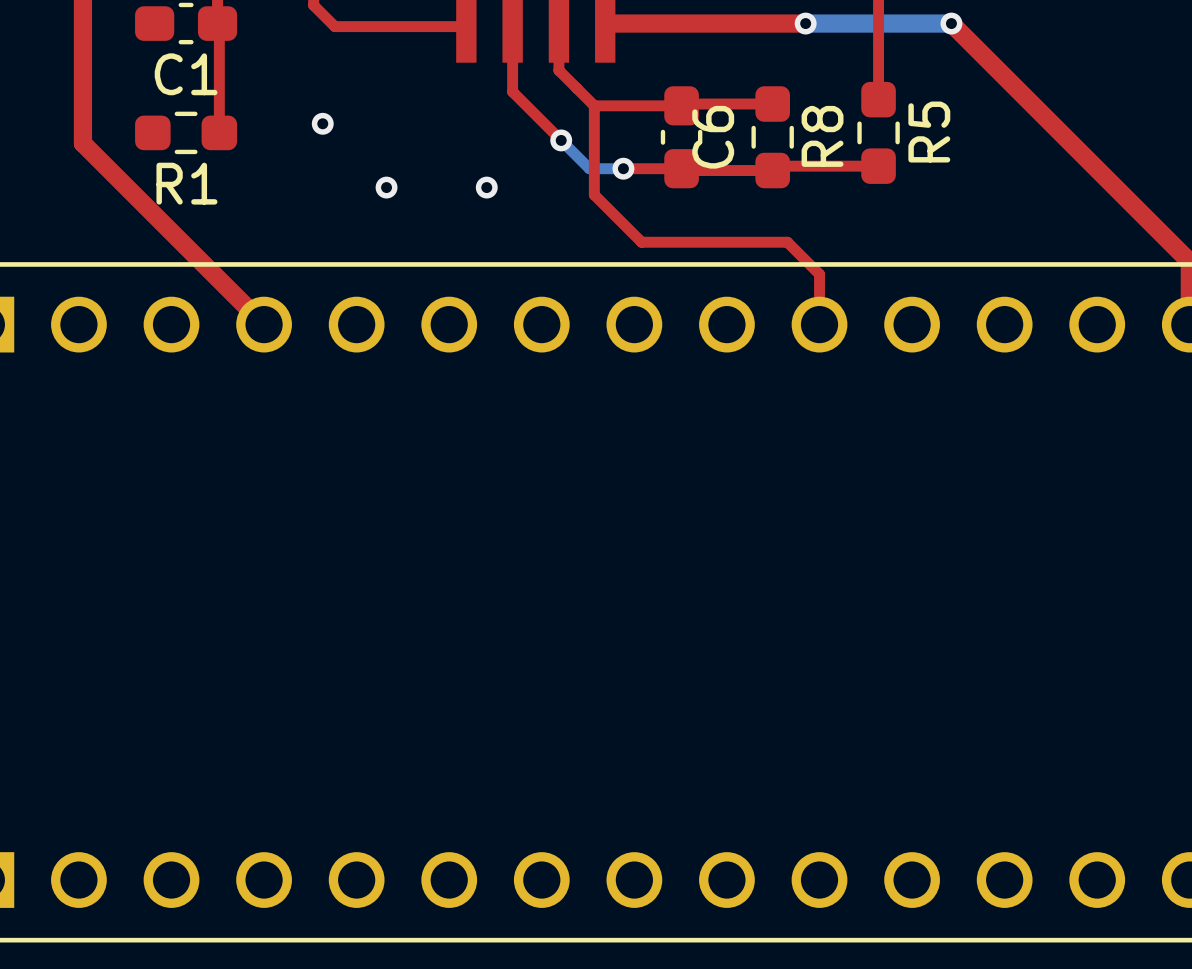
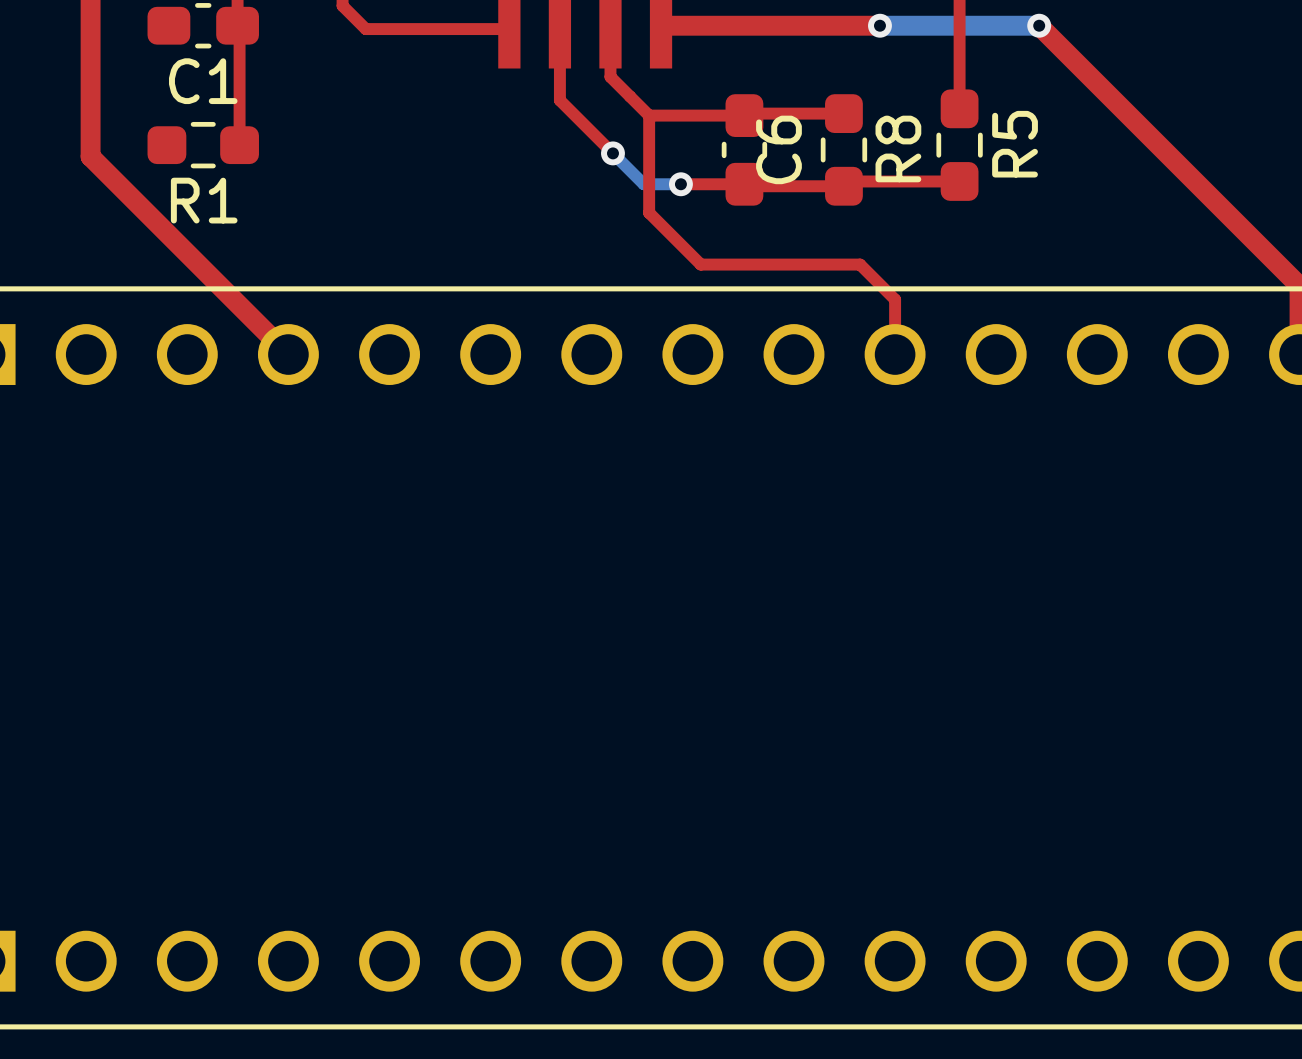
via: (322, 123) -> none
via: (386, 187) -> none
via: (486, 187) -> none

